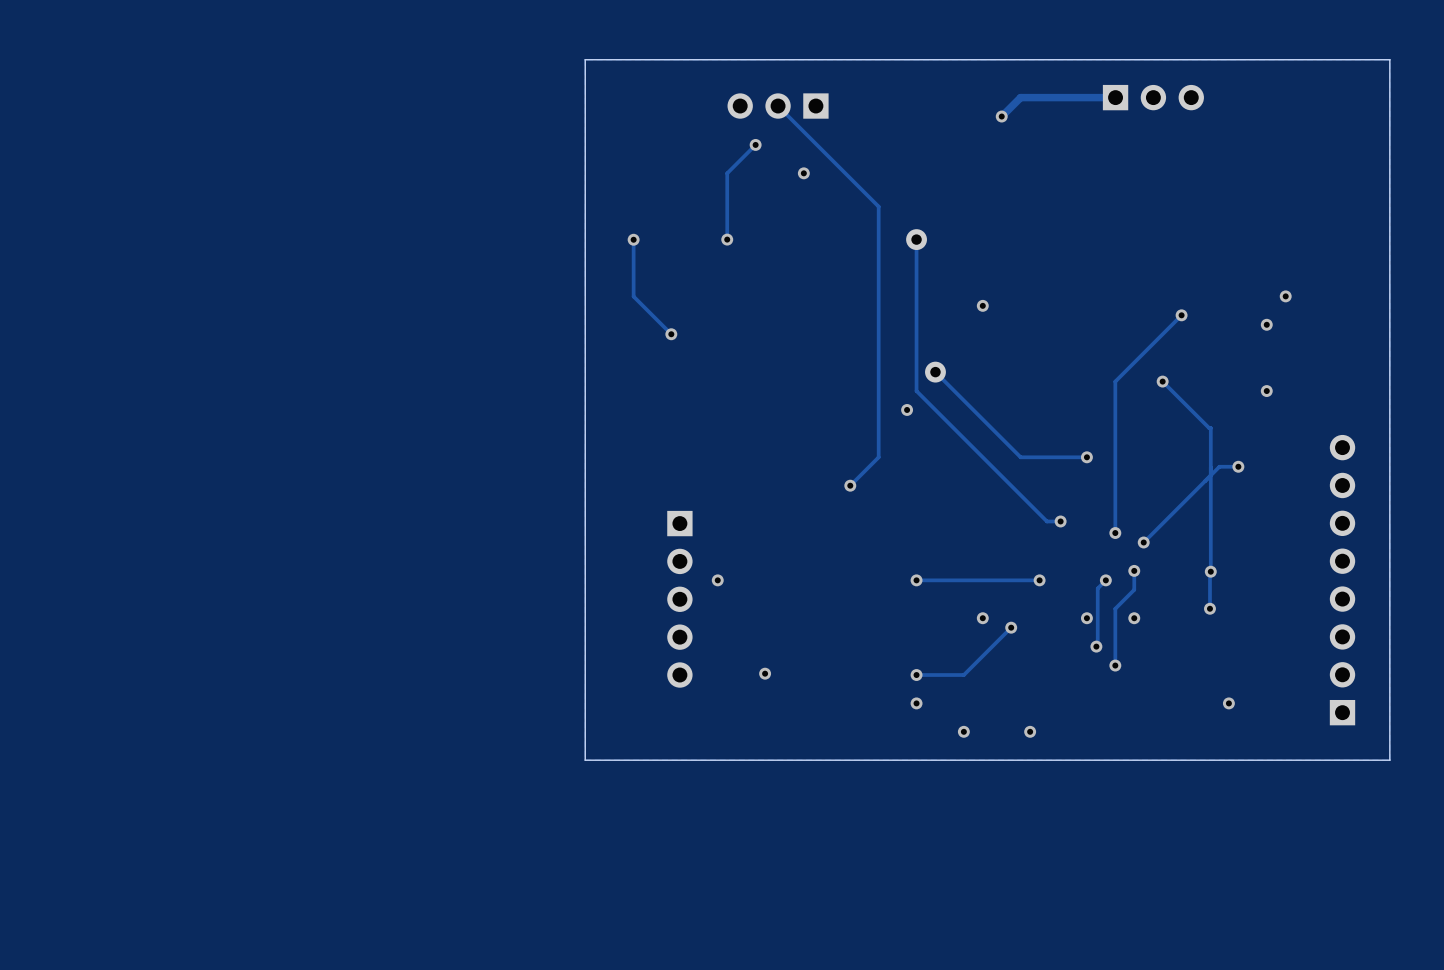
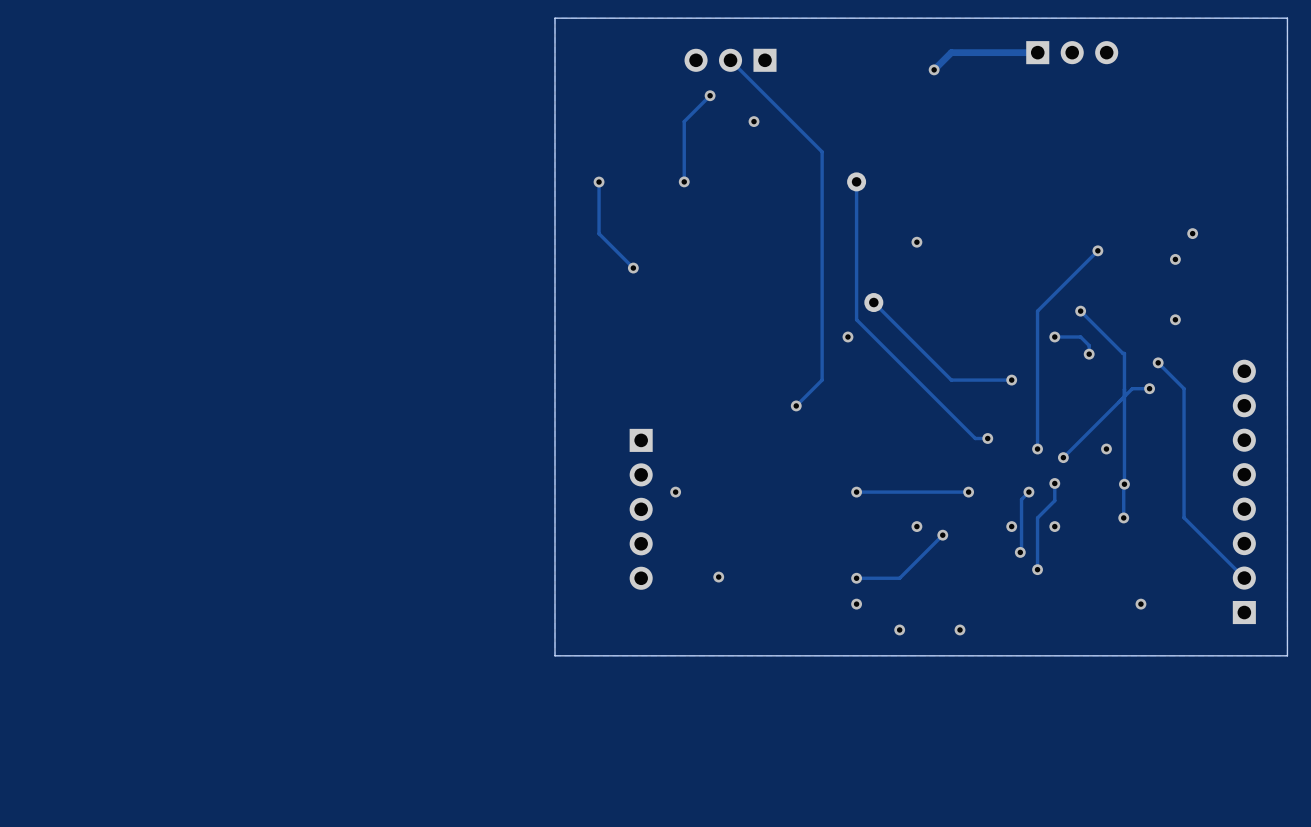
track: none -> (1054, 336) (1080, 336) (1089, 345) (1089, 354)
via: none -> (1054, 336)
via: none -> (1089, 354)
track: none -> (1158, 362) (1184, 388) (1184, 517) (1244, 578)
via: none -> (1158, 362)
via: none -> (1106, 449)

